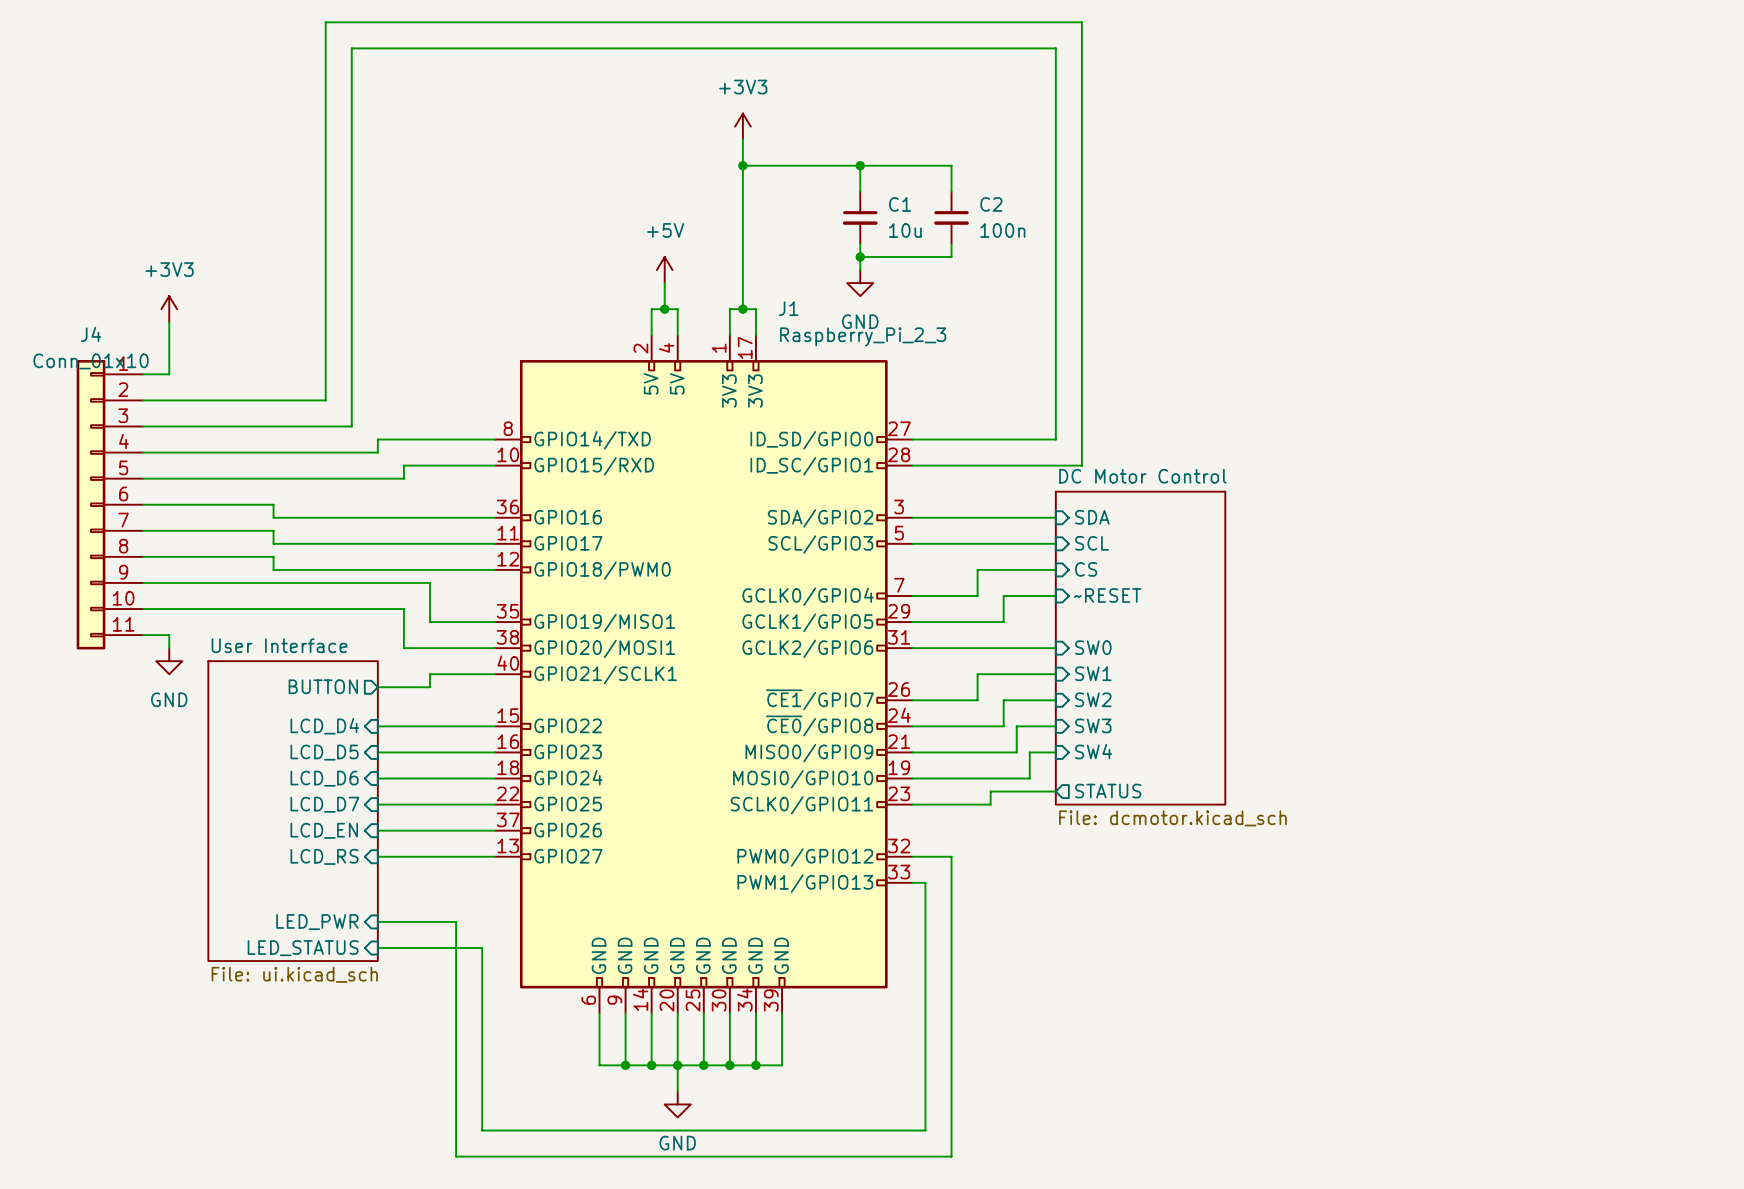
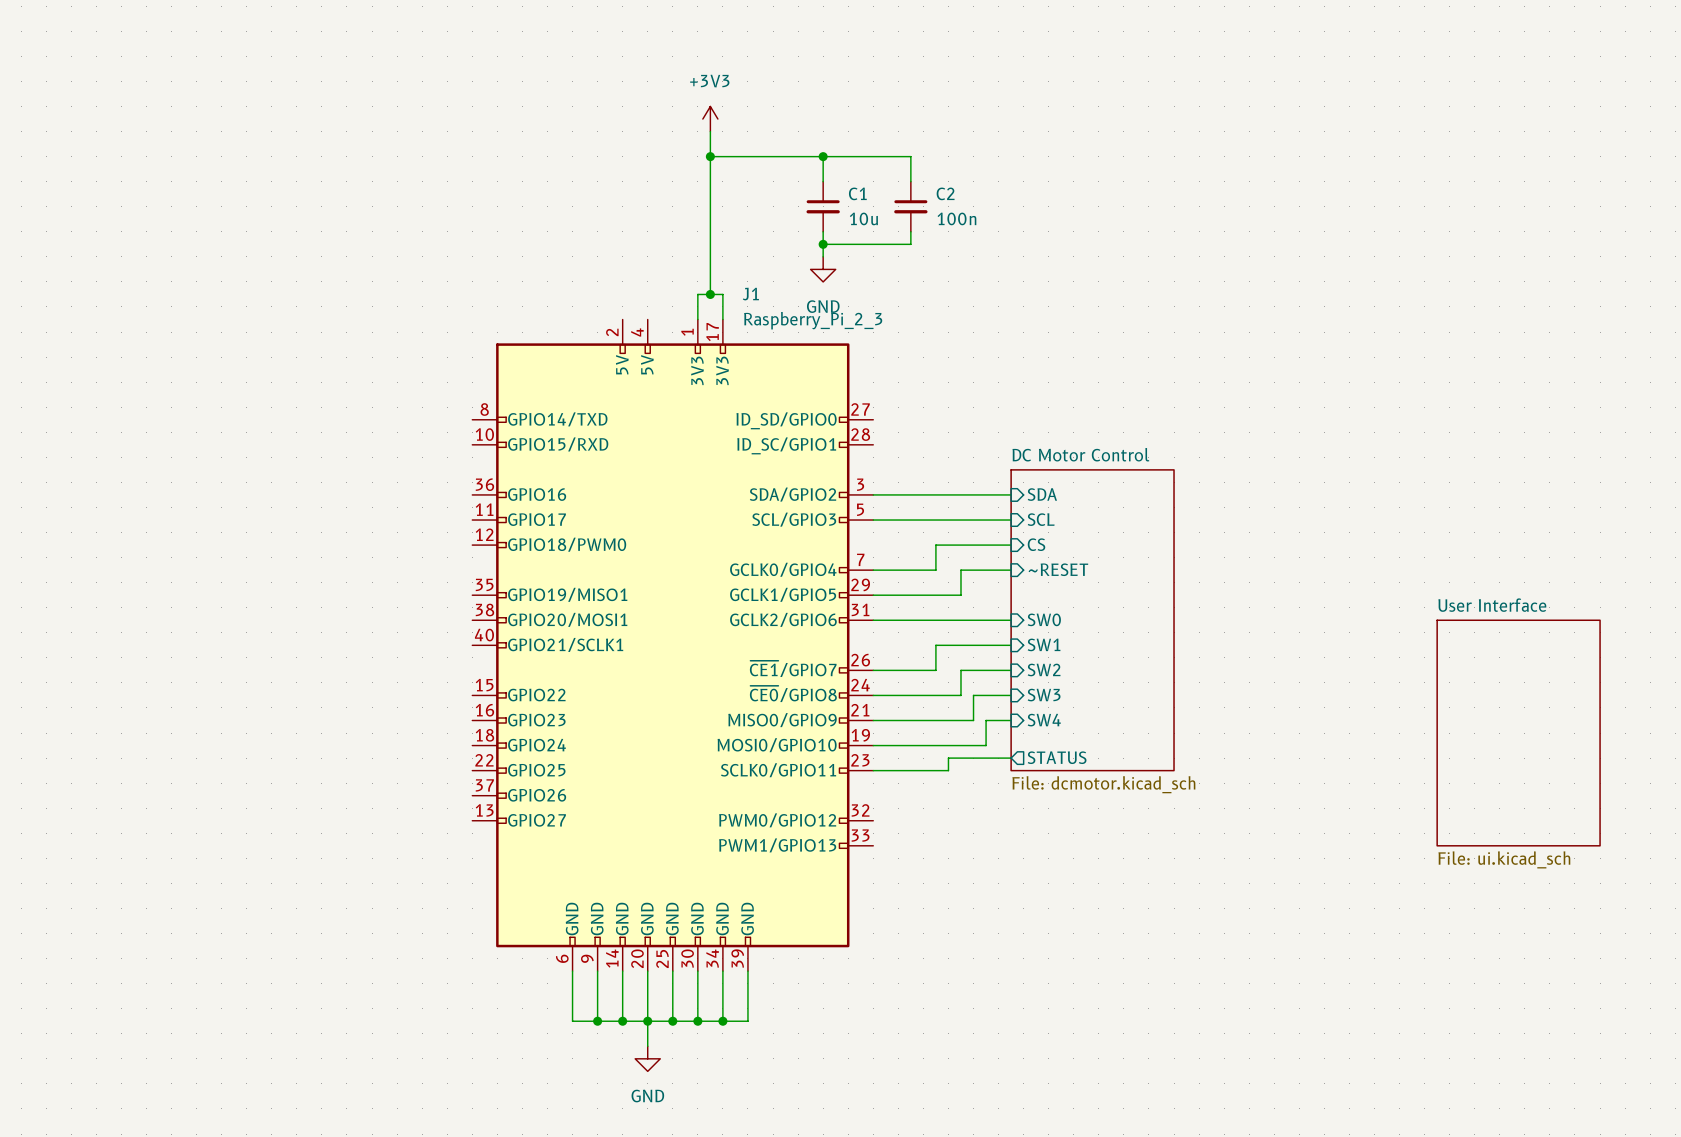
power symbol: +5V (664, 270) -> none
wire: (664, 283) (664, 309) -> none
power symbol: +3V3 (169, 309) -> none
junction: (664, 309) -> none
wire: (169, 322) (169, 374) (143, 374) -> none
wire: (651, 335) (651, 309) (677, 309) (677, 335) -> none
wire: (143, 400) (325, 400) (325, 22) (1081, 22) (1081, 465) (912, 465) -> none
wire: (143, 426) (351, 426) (351, 48) (1055, 48) (1055, 439) (912, 439) -> none
wire: (495, 439) (377, 439) (377, 452) (143, 452) -> none
wire: (495, 465) (403, 465) (403, 478) (143, 478) -> none
J4: Conn_01x10 (109, 504) -> none
wire: (143, 504) (273, 504) (273, 517) (495, 517) -> none
wire: (143, 530) (273, 530) (273, 543) (495, 543) -> none
wire: (143, 556) (273, 556) (273, 569) (495, 569) -> none
wire: (143, 582) (430, 582) (430, 622) (495, 622) -> none
wire: (143, 609) (403, 609) (403, 648) (495, 648) -> none
wire: (143, 635) (169, 635) (169, 648) -> none
power symbol: GND (169, 661) -> none
wire: (495, 674) (430, 674) (430, 687) (377, 687) -> none
sheet pin: BUTTON (323, 686) -> none
sheet pin: LCD_D4 (324, 726) -> none
wire: (377, 726) (495, 726) -> none
sheet pin: LCD_D5 (324, 752) -> none
wire: (377, 752) (495, 752) -> none
sheet User Interface: none -> File: ui.kicad_sch (1518, 733)
sheet pin: LCD_D6 (324, 778) -> none
wire: (377, 778) (495, 778) -> none
sheet pin: LCD_D7 (324, 804) -> none
wire: (377, 804) (495, 804) -> none
sheet User Interface: File: ui.kicad_sch (293, 811) -> none
sheet pin: LCD_EN (324, 830) -> none
wire: (377, 830) (495, 830) -> none
sheet pin: LCD_RS (324, 856) -> none
wire: (377, 856) (495, 856) -> none
wire: (912, 856) (951, 856) (951, 1156) (456, 1156) (456, 921) (377, 921) -> none
wire: (912, 882) (925, 882) (925, 1130) (482, 1130) (482, 948) (377, 948) -> none
sheet pin: LED_PWR (317, 922) -> none
sheet pin: LED_STATUS (303, 948) -> none

